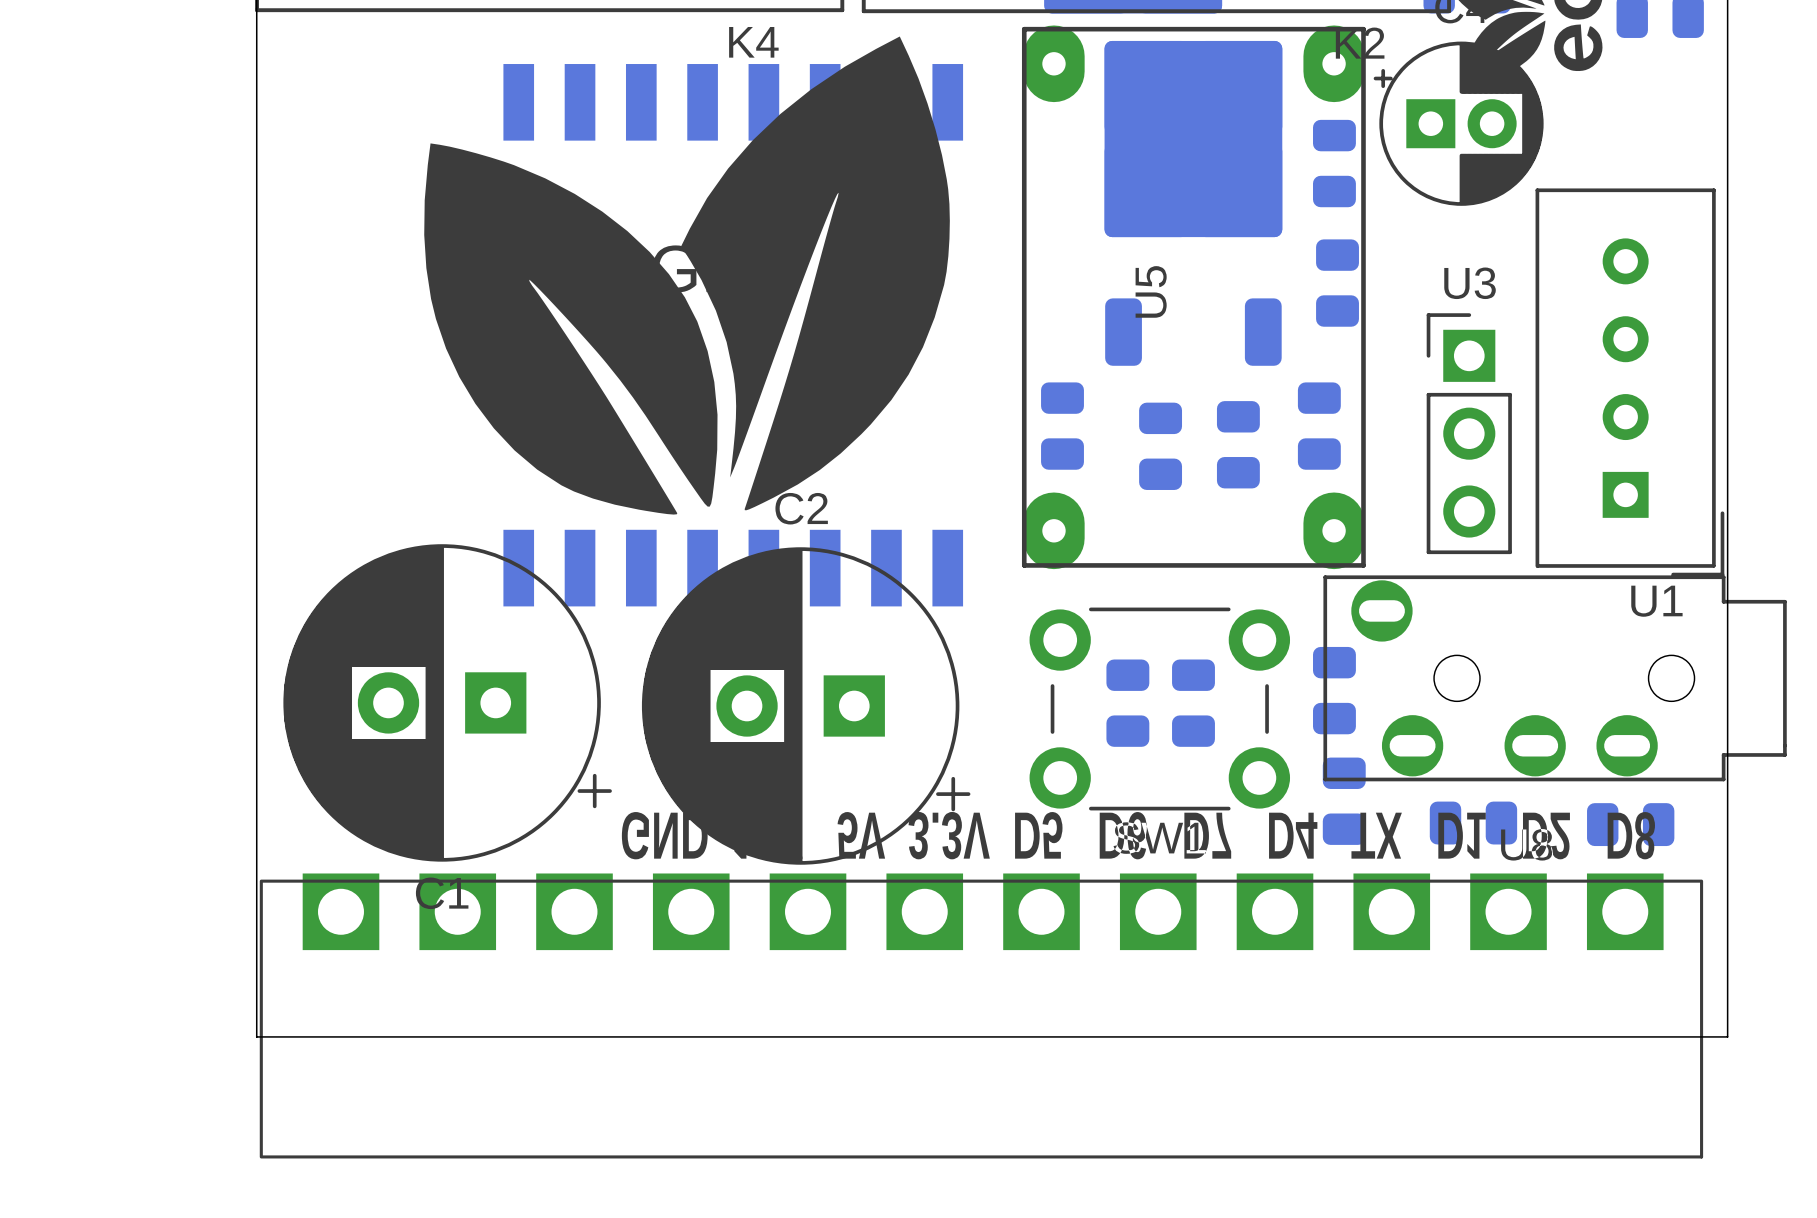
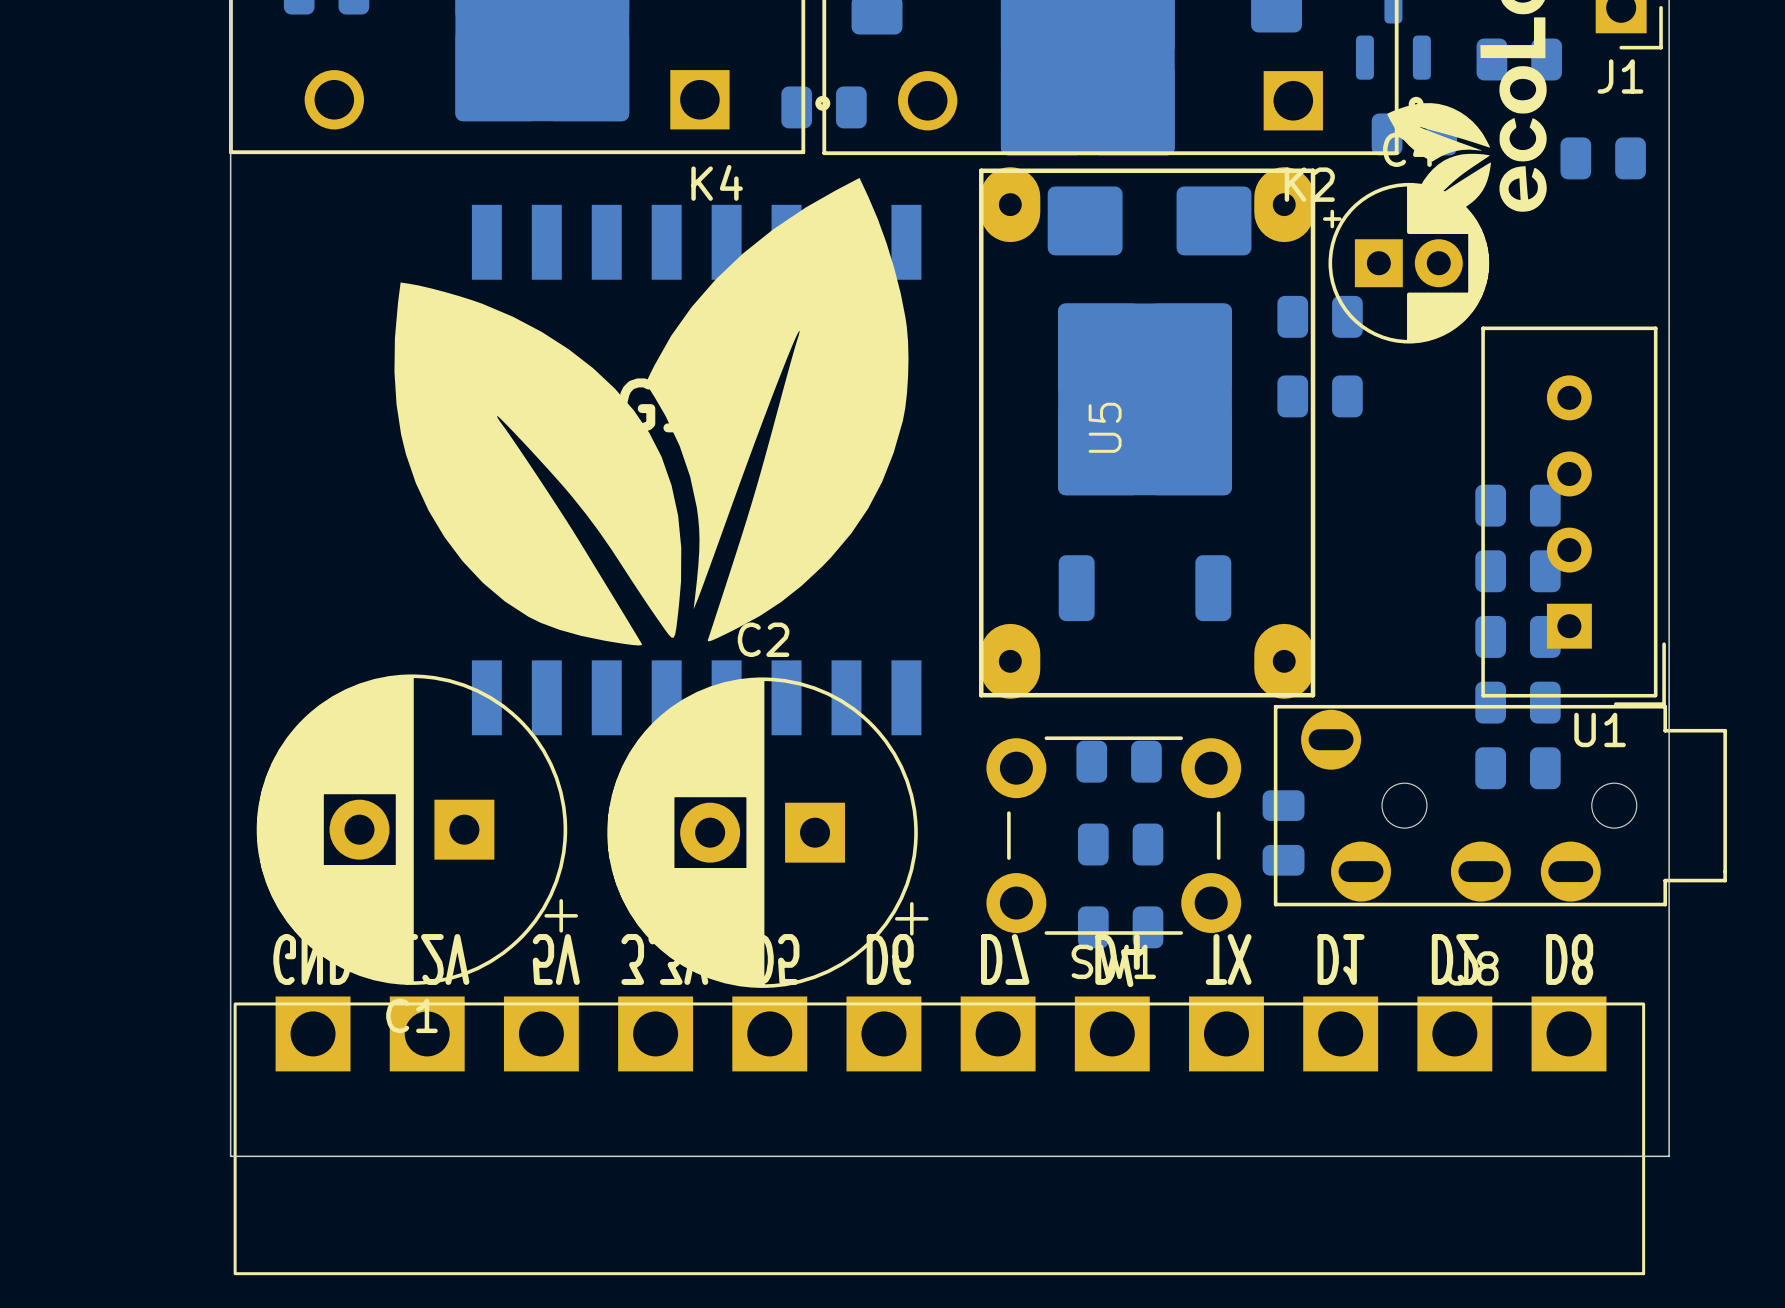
part: none -> (1149, 220)
part rotation: 0° (1334, 163) -> 90° clockwise (1320, 316)
part position: (1193, 203) -> (1145, 462)
part rotation: 0° (1337, 283) -> 90° clockwise (1320, 396)
part: none -> (1517, 505)
part: (1062, 426) -> none
part: (1319, 426) -> none
U3: (1469, 433) -> none
part: none -> (1517, 571)
part: (1238, 444) -> none
part: (1160, 446) -> none
part: none -> (1517, 636)
part: none -> (1517, 702)
part: none -> (1119, 761)
part: none -> (1517, 768)
part position: (1334, 690) -> (1283, 832)
part: (1127, 703) -> none
part: (1193, 703) -> none
part: none -> (1120, 844)
part: (1344, 801) -> none
part: none -> (1120, 927)
part: (1473, 823) -> none
part: (1630, 824) -> none

